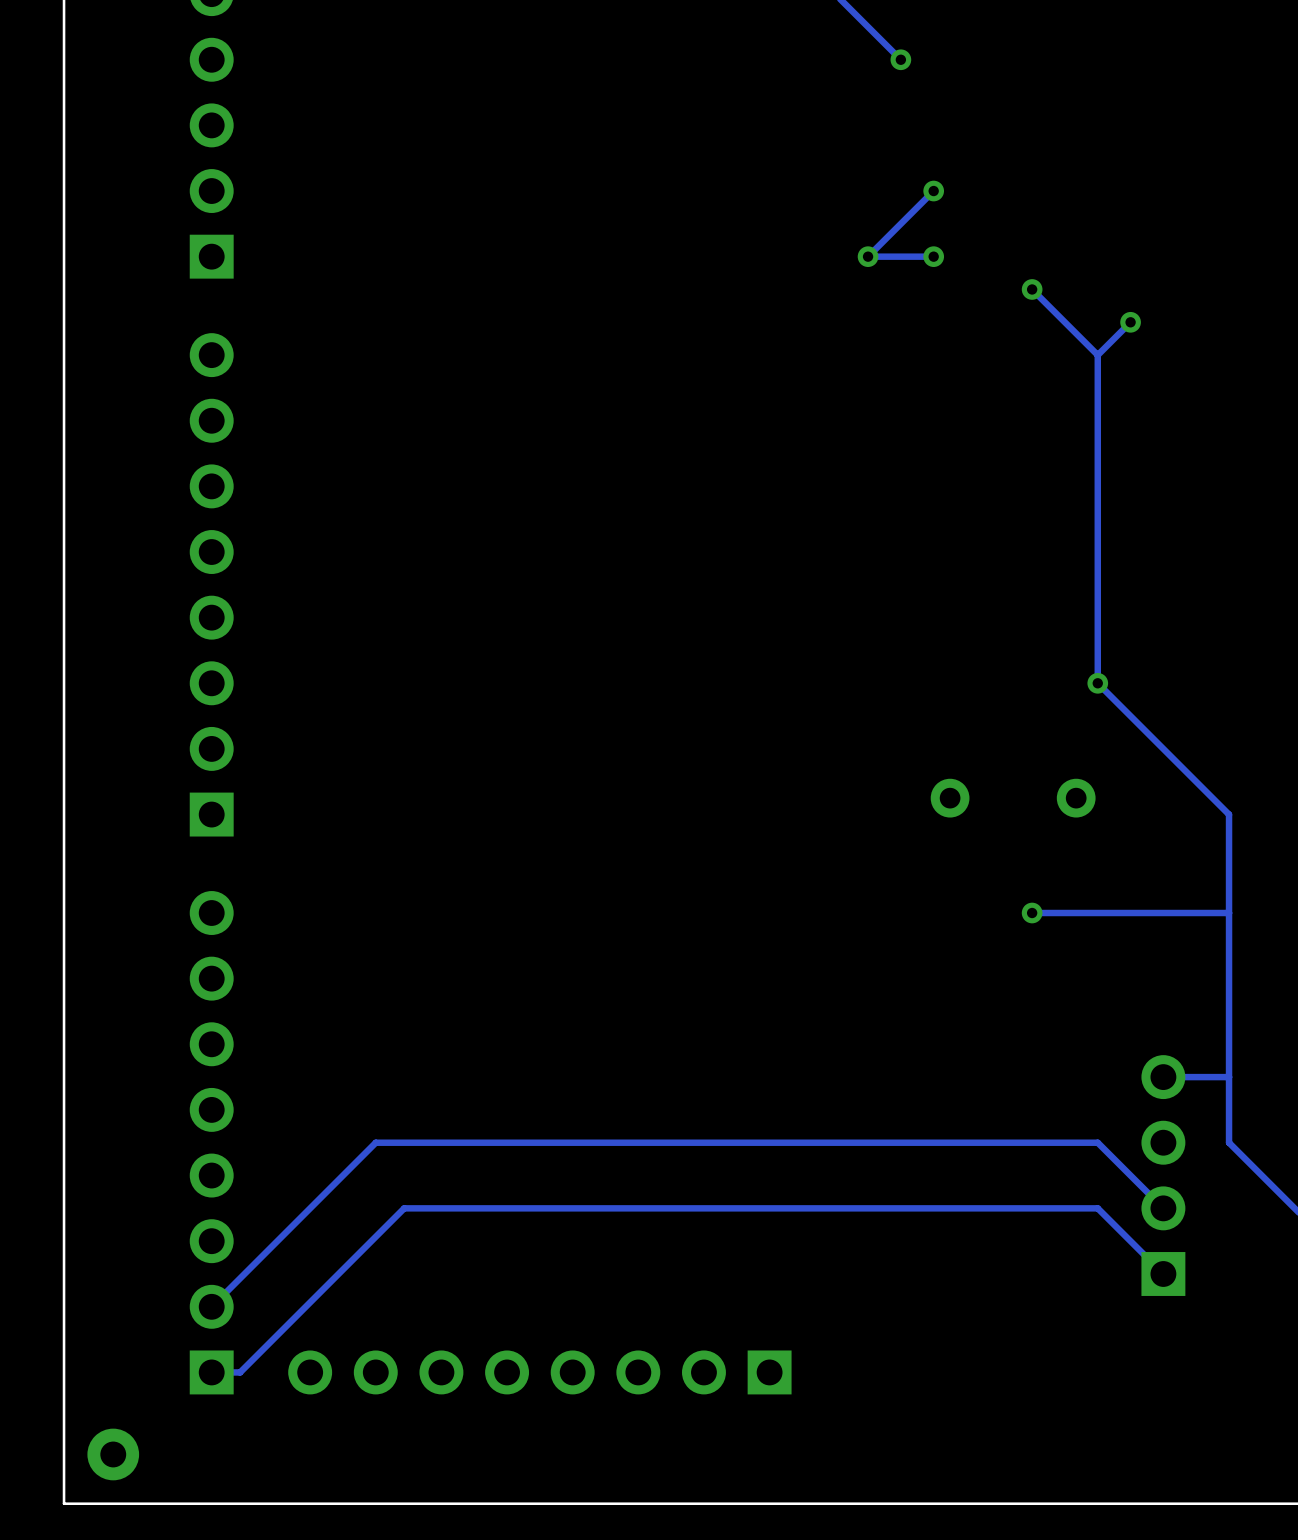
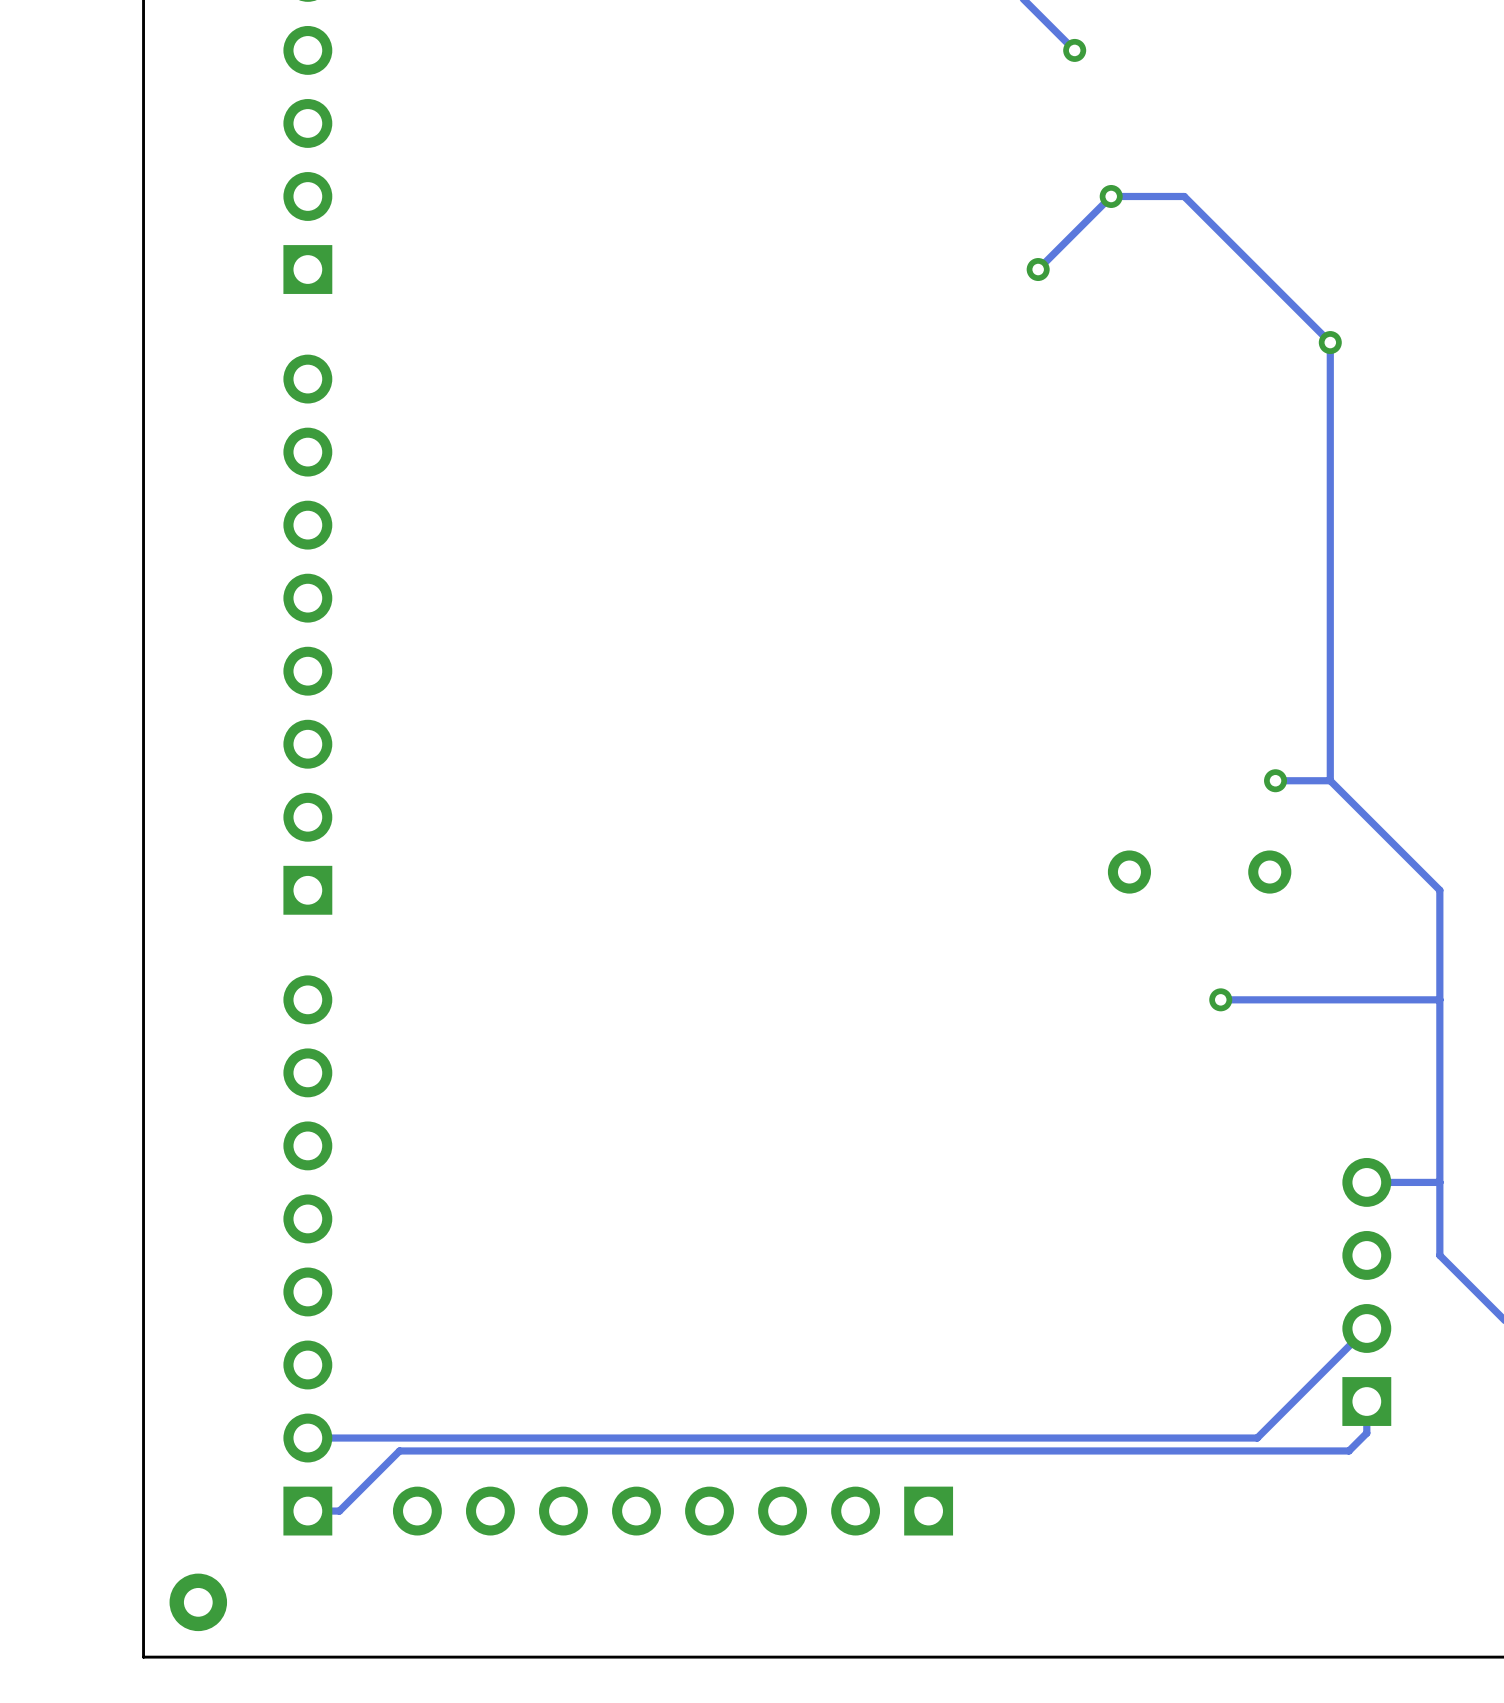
track: none -> (1111, 196) (1184, 196) (1330, 342) (1330, 780) (1275, 780)
track: (933, 256) (868, 256) -> none
via: (933, 256) -> none
track: (1032, 289) (1097, 355) -> none
via: (1032, 289) -> none
track: (1130, 322) (1097, 355) -> none
track: (1097, 355) (1097, 683) (1130, 716) -> none
via position: (1097, 683) -> (1275, 780)
track: (1163, 1208) (1097, 1142) (375, 1142) (211, 1306) -> (1366, 1328) (1257, 1438) (307, 1438)
track: (1163, 1273) (1097, 1208) (404, 1208) (294, 1318) -> (1366, 1401) (1366, 1433) (1348, 1450) (399, 1450)

